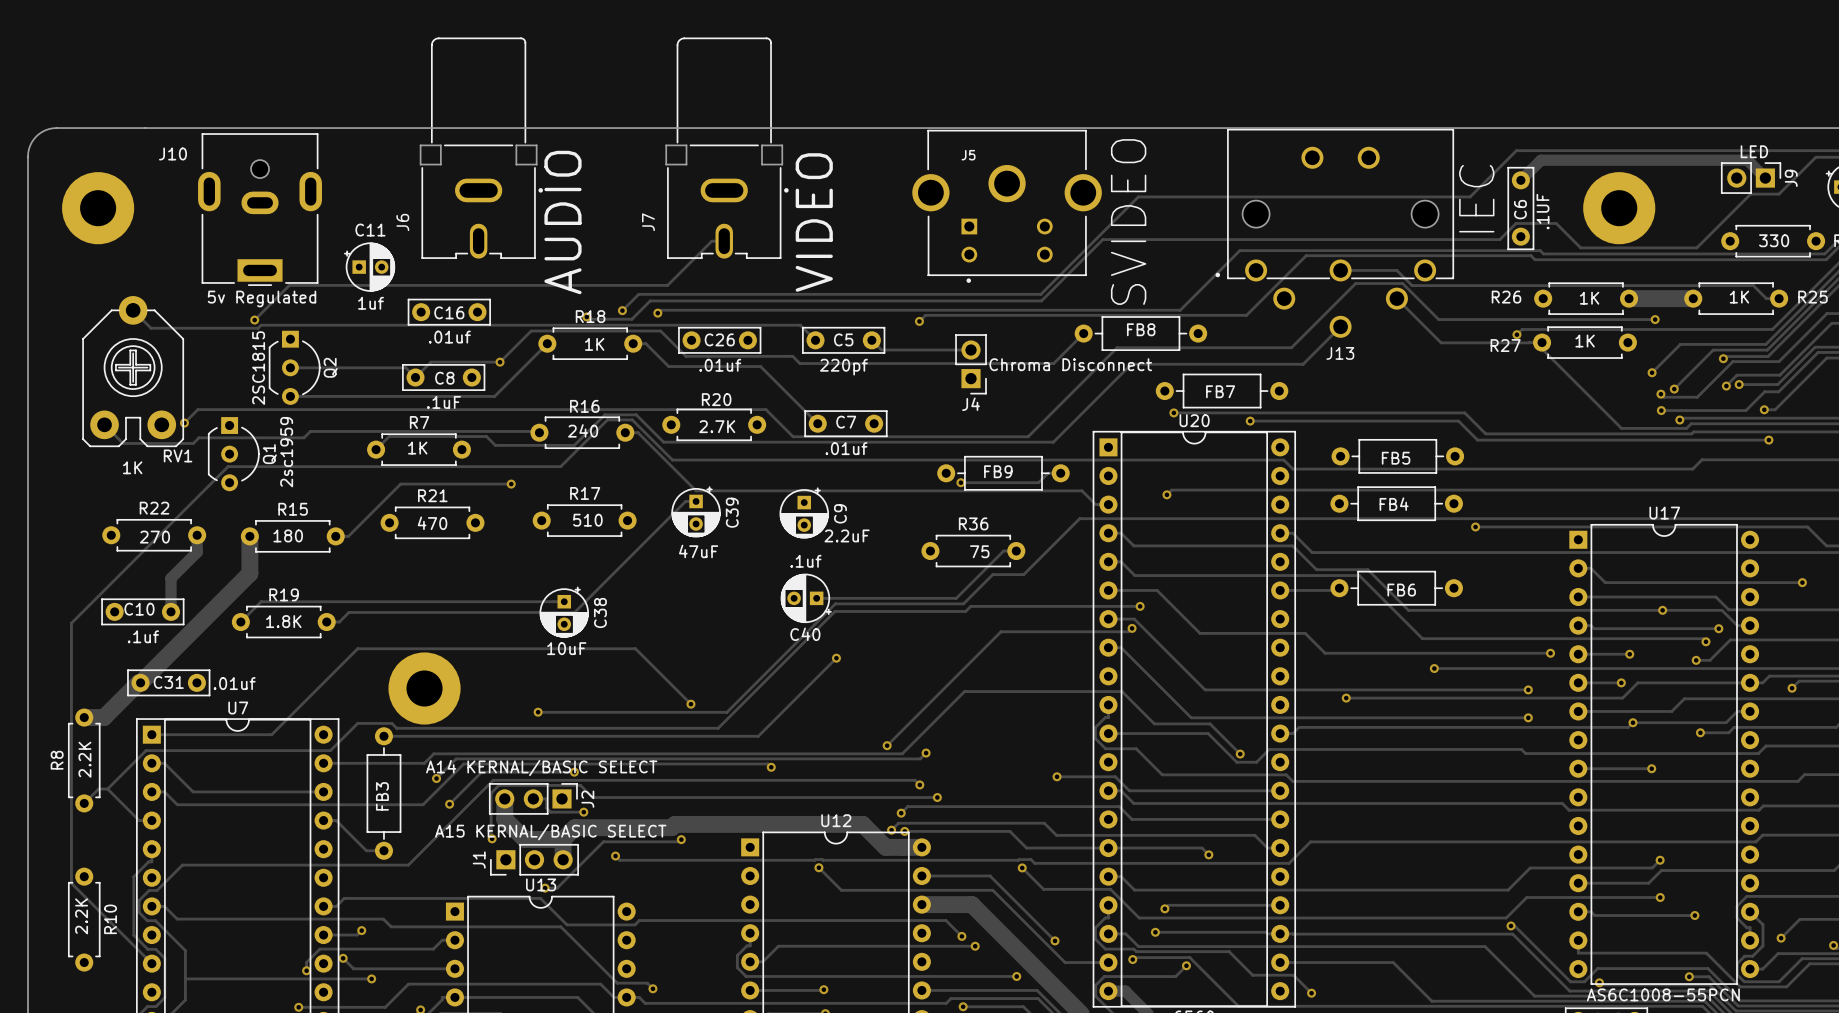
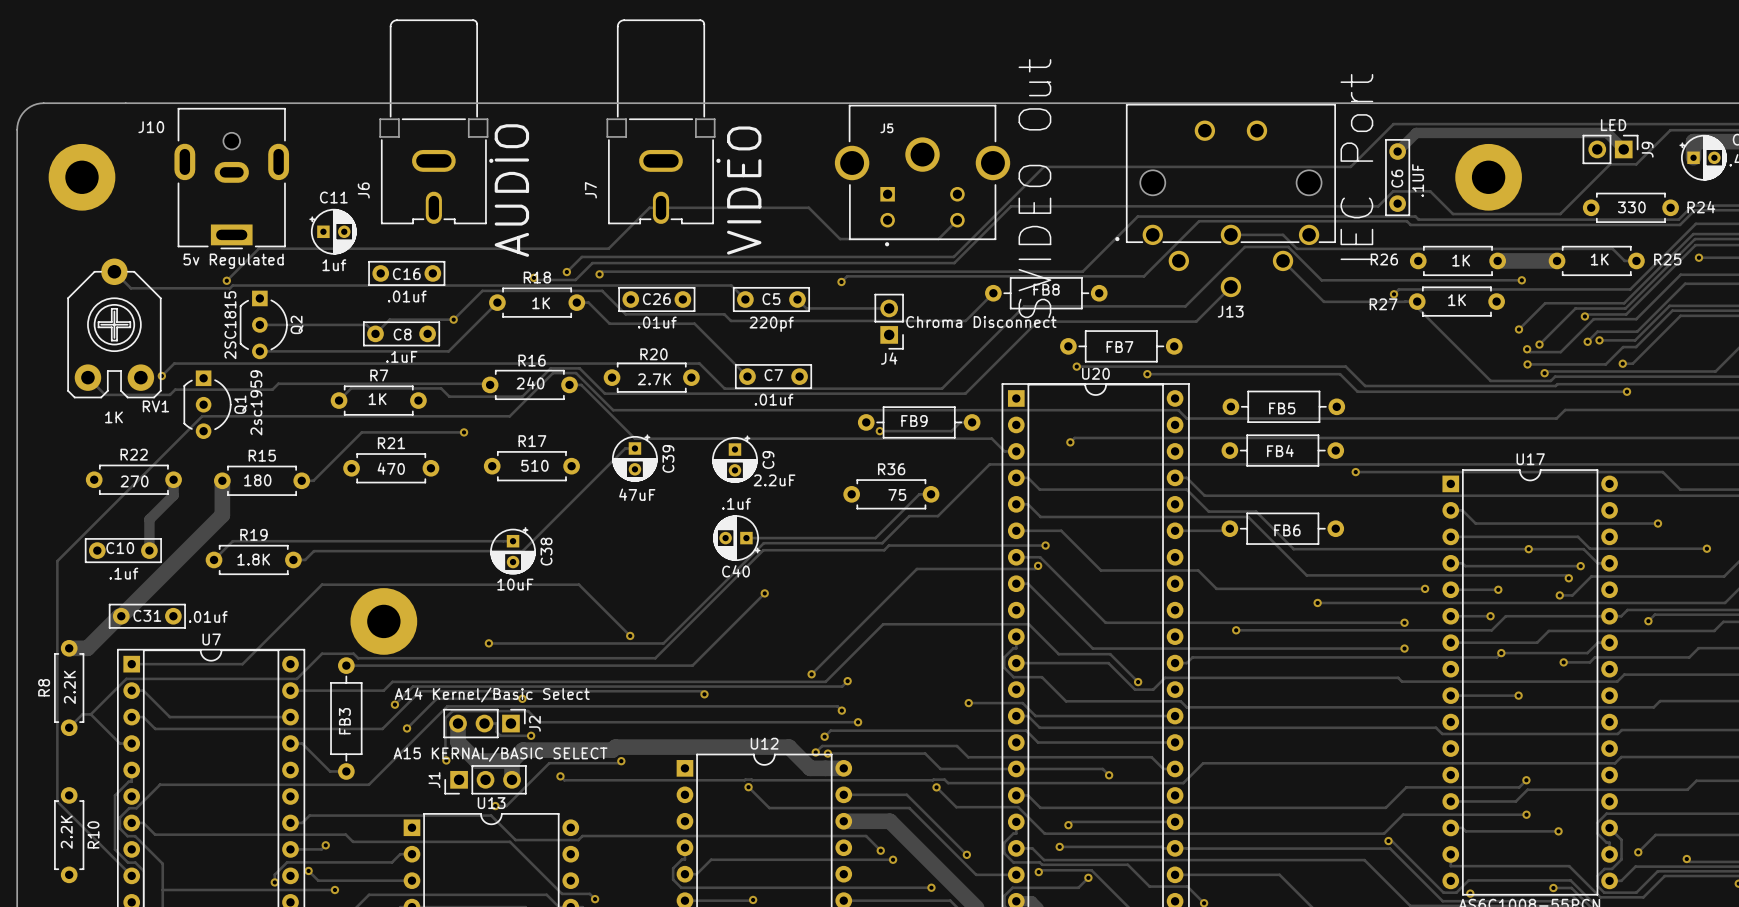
J13 value: IEC (1476, 198) -> IEC Port (1356, 167)
J5 value: SVIDEO (1128, 222) -> SVIDEO Out (1034, 188)
track: none -> (661, 207) (808, 207) (840, 239) (938, 239) (957, 220)
J2 value: A14 KERNAL/BASIC SELECT (541, 768) -> A14 Kernel/Basic Select (492, 694)

